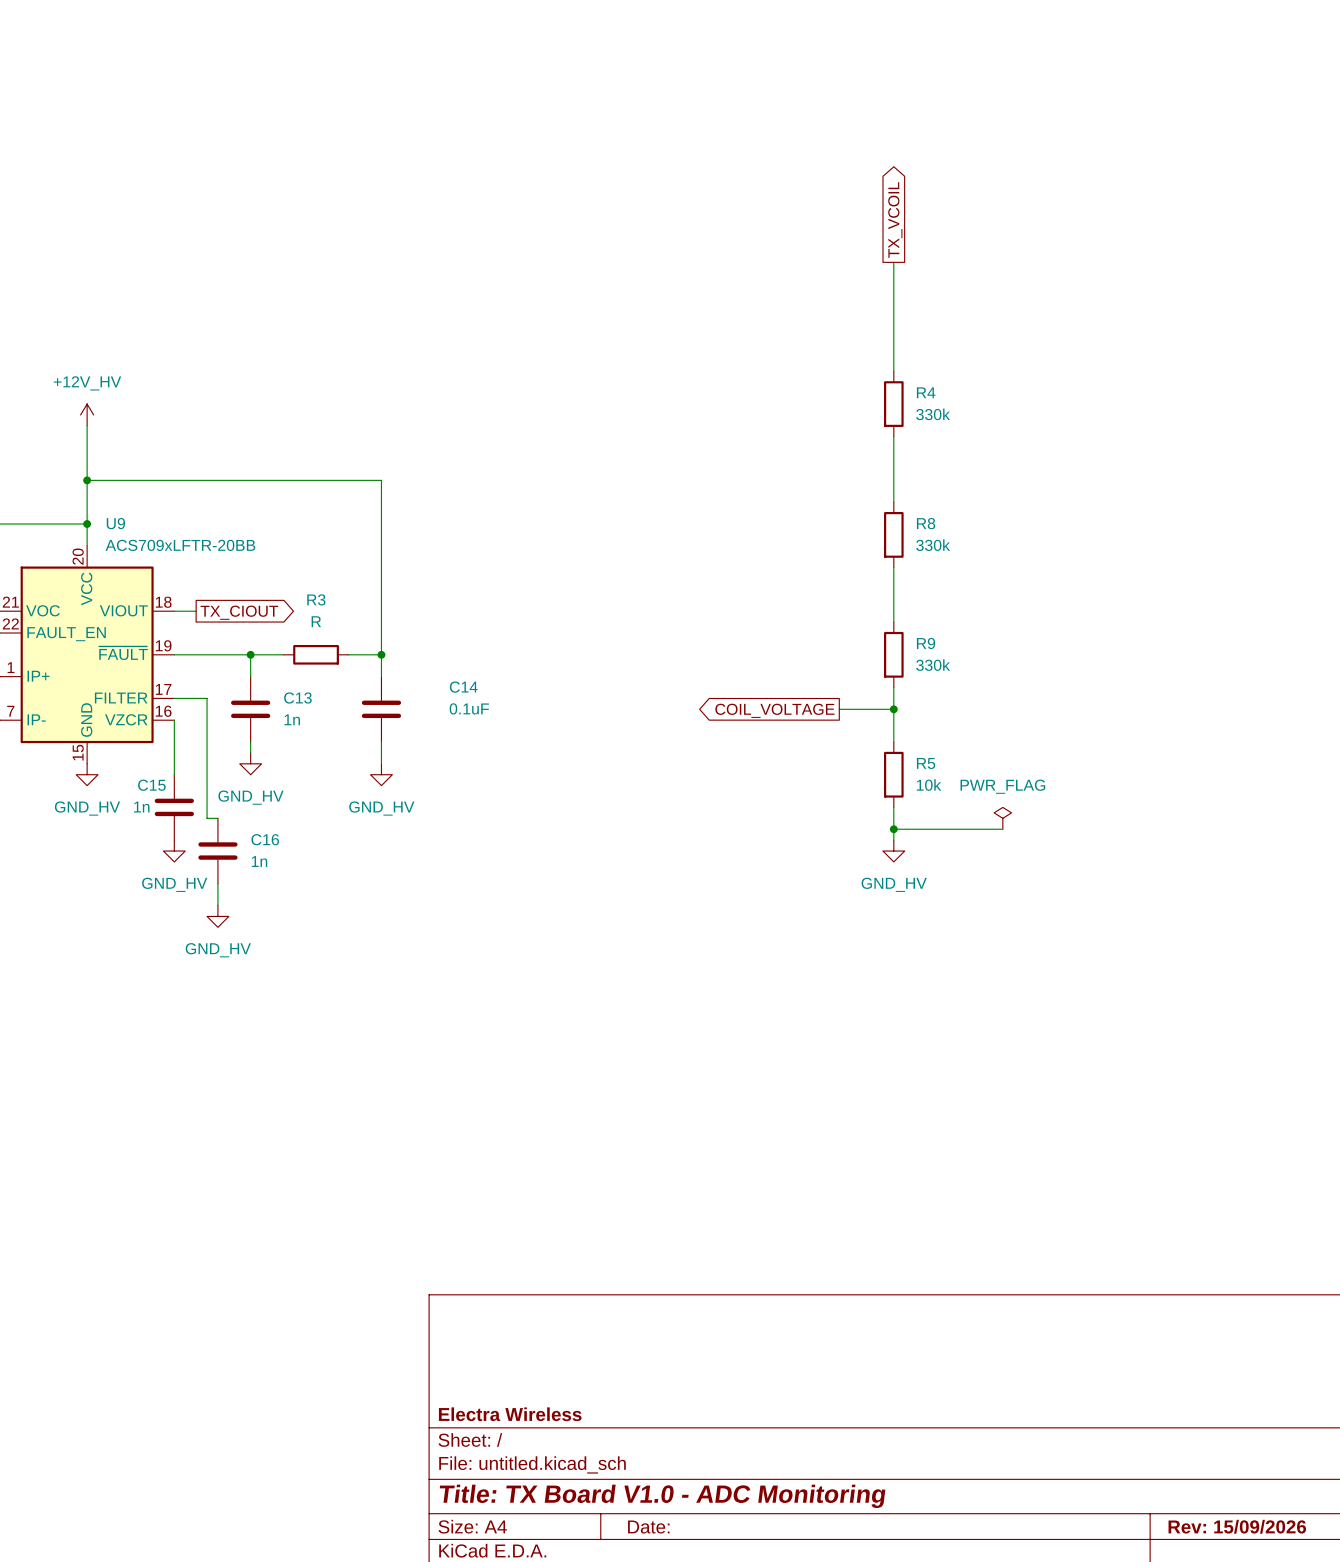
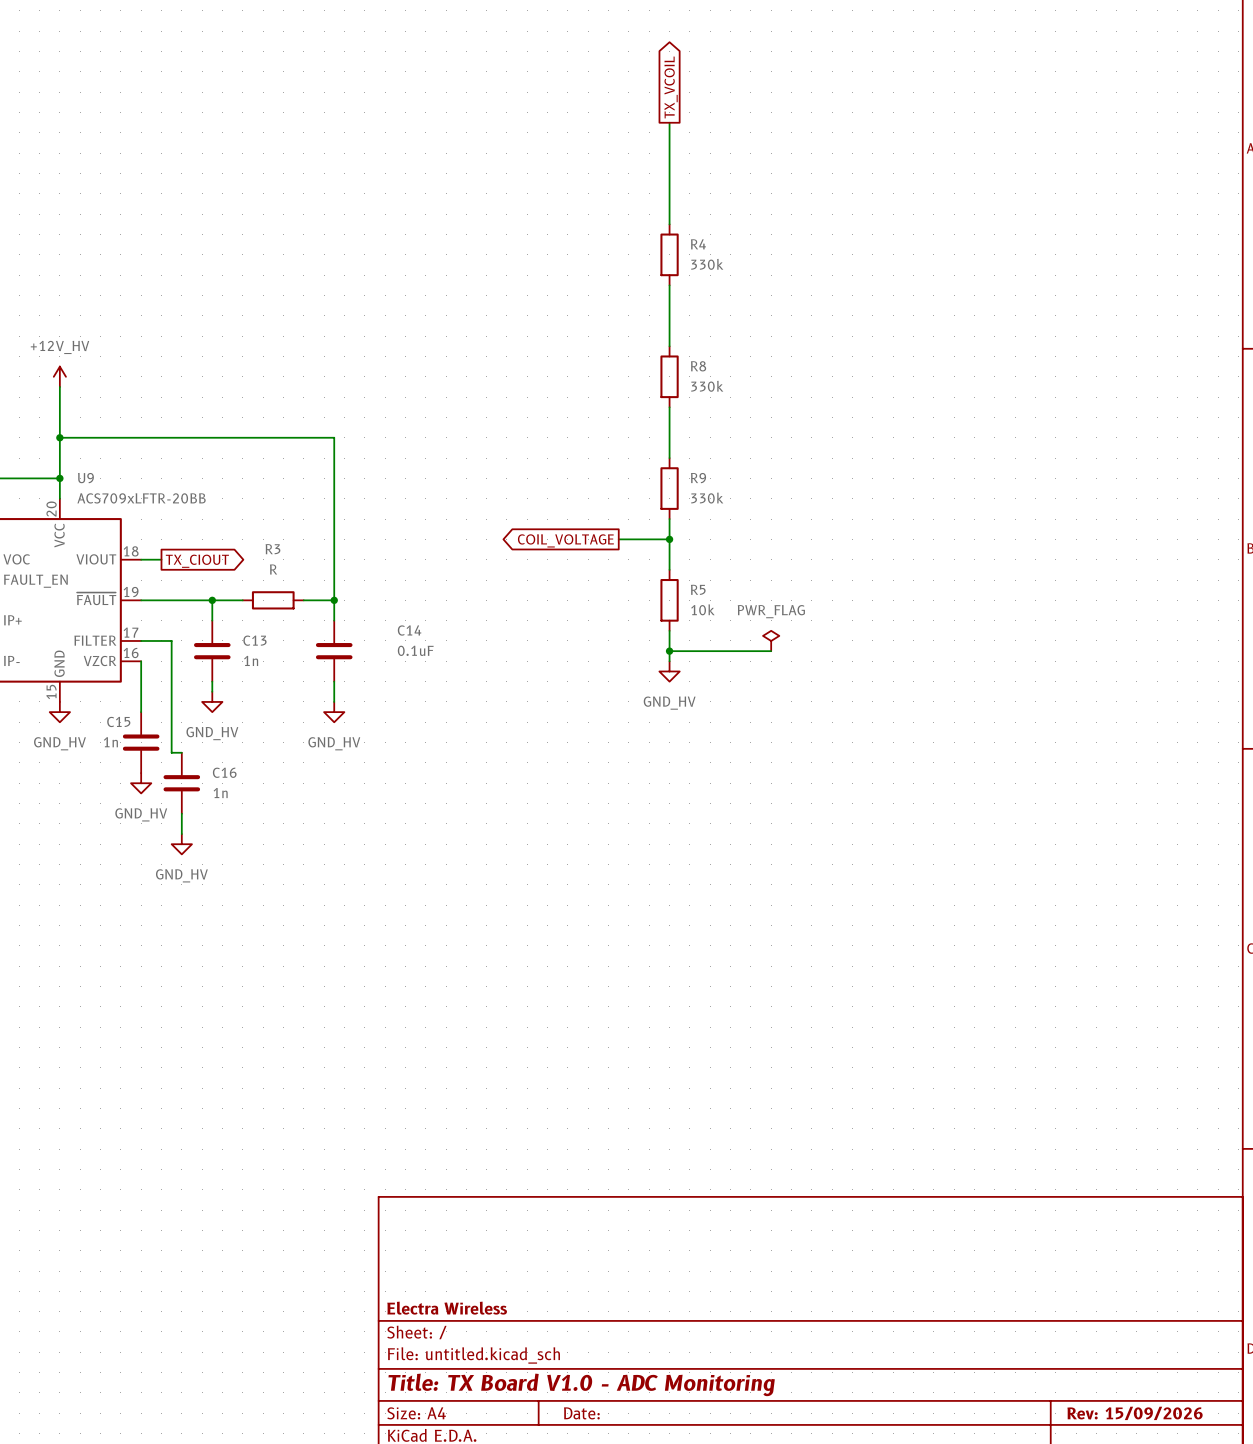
global label position: TX_VCOIL (895, 220) -> TX_VCOIL (671, 87)
wire: (893, 262) (893, 371) -> (669, 122) (669, 224)
R4 position: (893, 404) -> (669, 254)
wire: (893, 436) (893, 502) -> (669, 285) (669, 346)
R8 position: (893, 534) -> (669, 376)
wire: (893, 567) (893, 622) -> (669, 407) (669, 458)
wire: none -> (618, 539) (669, 539)
junction: none -> (669, 539)
R9 position: (893, 654) -> (669, 488)
wire: (893, 687) (893, 742) -> (669, 519) (669, 569)
wire: none -> (669, 651) (761, 651)
junction: none -> (669, 651)
wire: (850, 709) (893, 709) -> none
junction: (893, 709) -> none
global label position: COIL_VOLTAGE (774, 710) -> COIL_VOLTAGE (565, 540)
R5 position: (893, 774) -> (669, 600)
wire: (893, 807) (893, 840) -> (669, 630) (669, 661)
power symbol position: PWR_FLAG (1002, 818) -> PWR_FLAG (771, 640)
wire: (893, 829) (1002, 829) -> none
junction: (893, 829) -> none
power symbol position: GND_HV (893, 851) -> GND_HV (669, 671)

